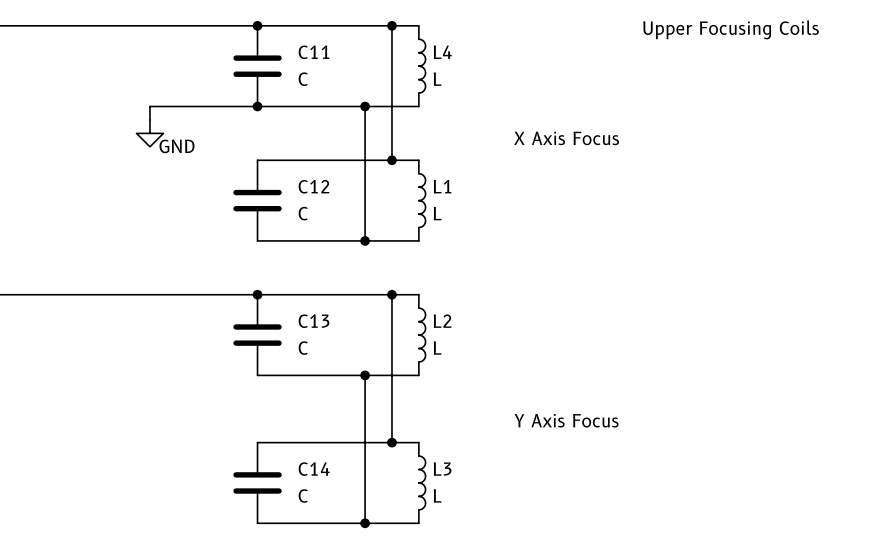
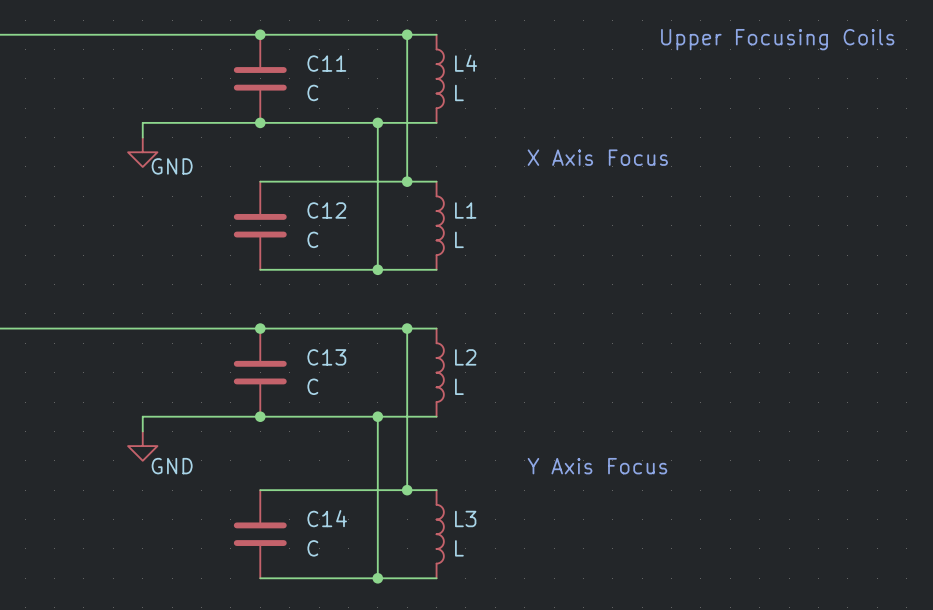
wire: none -> (260, 416) (142, 416) (142, 431)
junction: none -> (260, 416)
power symbol: none -> GND (142, 446)

